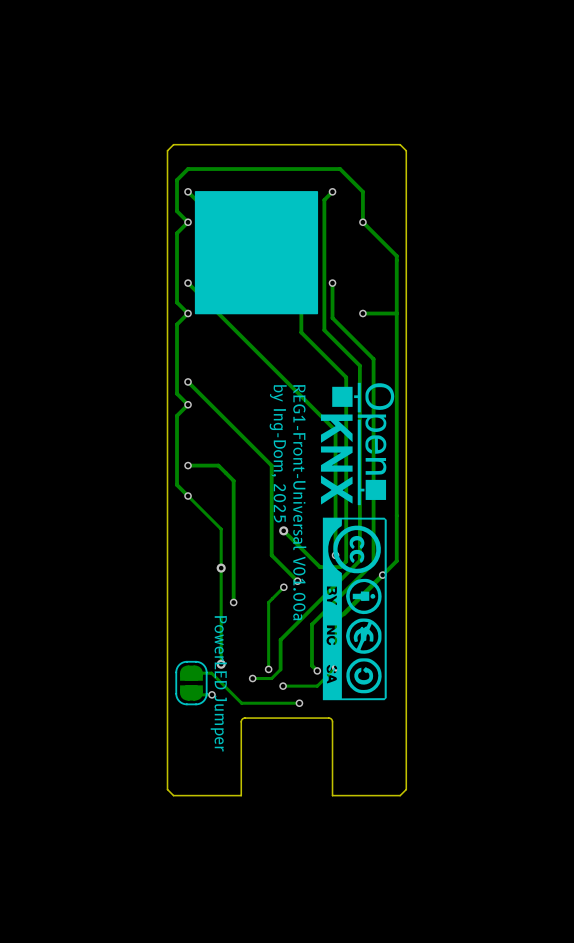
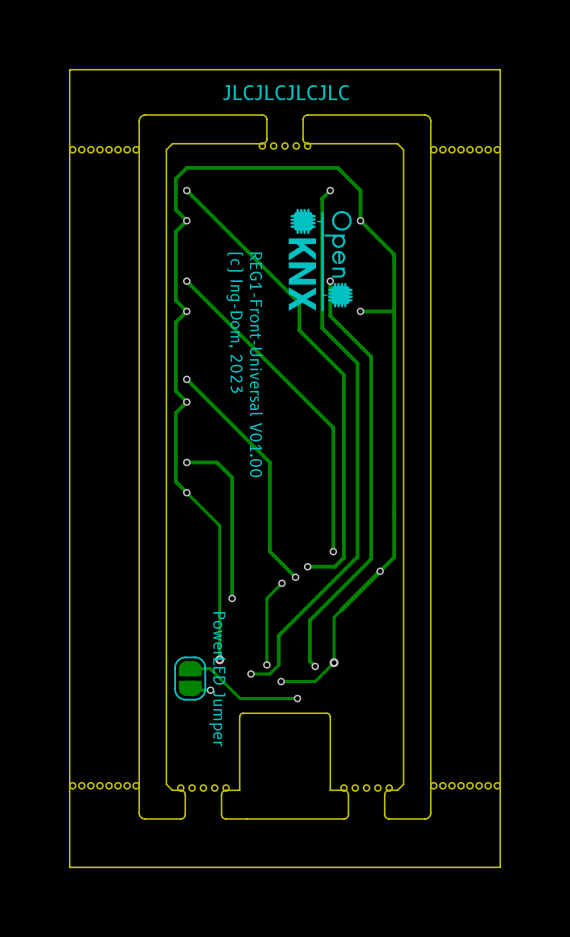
board edge: none -> (500, 69) (500, 867) (69, 867) (69, 69) (500, 69)
text: none -> JLCJLCJLCJLC (286, 92)
board edge: (309, 144) (264, 144) -> (307, 143) (303, 139) (303, 118) (307, 115) (424, 115) (430, 119) (429, 816) (424, 819) (386, 818) (384, 815) (384, 794) (389, 790)
part: none -> (284, 145)
part: none -> (104, 149)
part: none -> (465, 149)
drawing: [194, 191, 319, 315] -> none
drawing: none -> [288, 208, 353, 312]
text: none -> (c) Ing-Dom, 2023 (234, 322)
text: none -> REG1-Front-Universal V01.00 (256, 364)
drawing: [320, 382, 395, 701] -> none
text: by Ing-Dom, 2025 (278, 453) -> none
text: REG1-Front-Universal V01.00a (299, 502) -> none
track: (283, 530) (319, 567) (340, 567) -> (307, 566) (334, 566) (338, 563)
via: (283, 530) -> none
via: (221, 568) -> none
via: none -> (307, 566)
part: none -> (104, 785)
part: none -> (465, 785)
part: none -> (203, 788)
part: none -> (366, 788)
board edge: (227, 795) (181, 795) -> (262, 143) (266, 139) (266, 118) (262, 115) (145, 115) (139, 119) (140, 816) (145, 819) (183, 818) (185, 815) (185, 794) (180, 790)
board edge: (391, 795) (346, 795) -> (226, 790) (221, 794) (221, 815) (226, 819) (345, 818) (348, 815) (348, 794) (343, 790)

